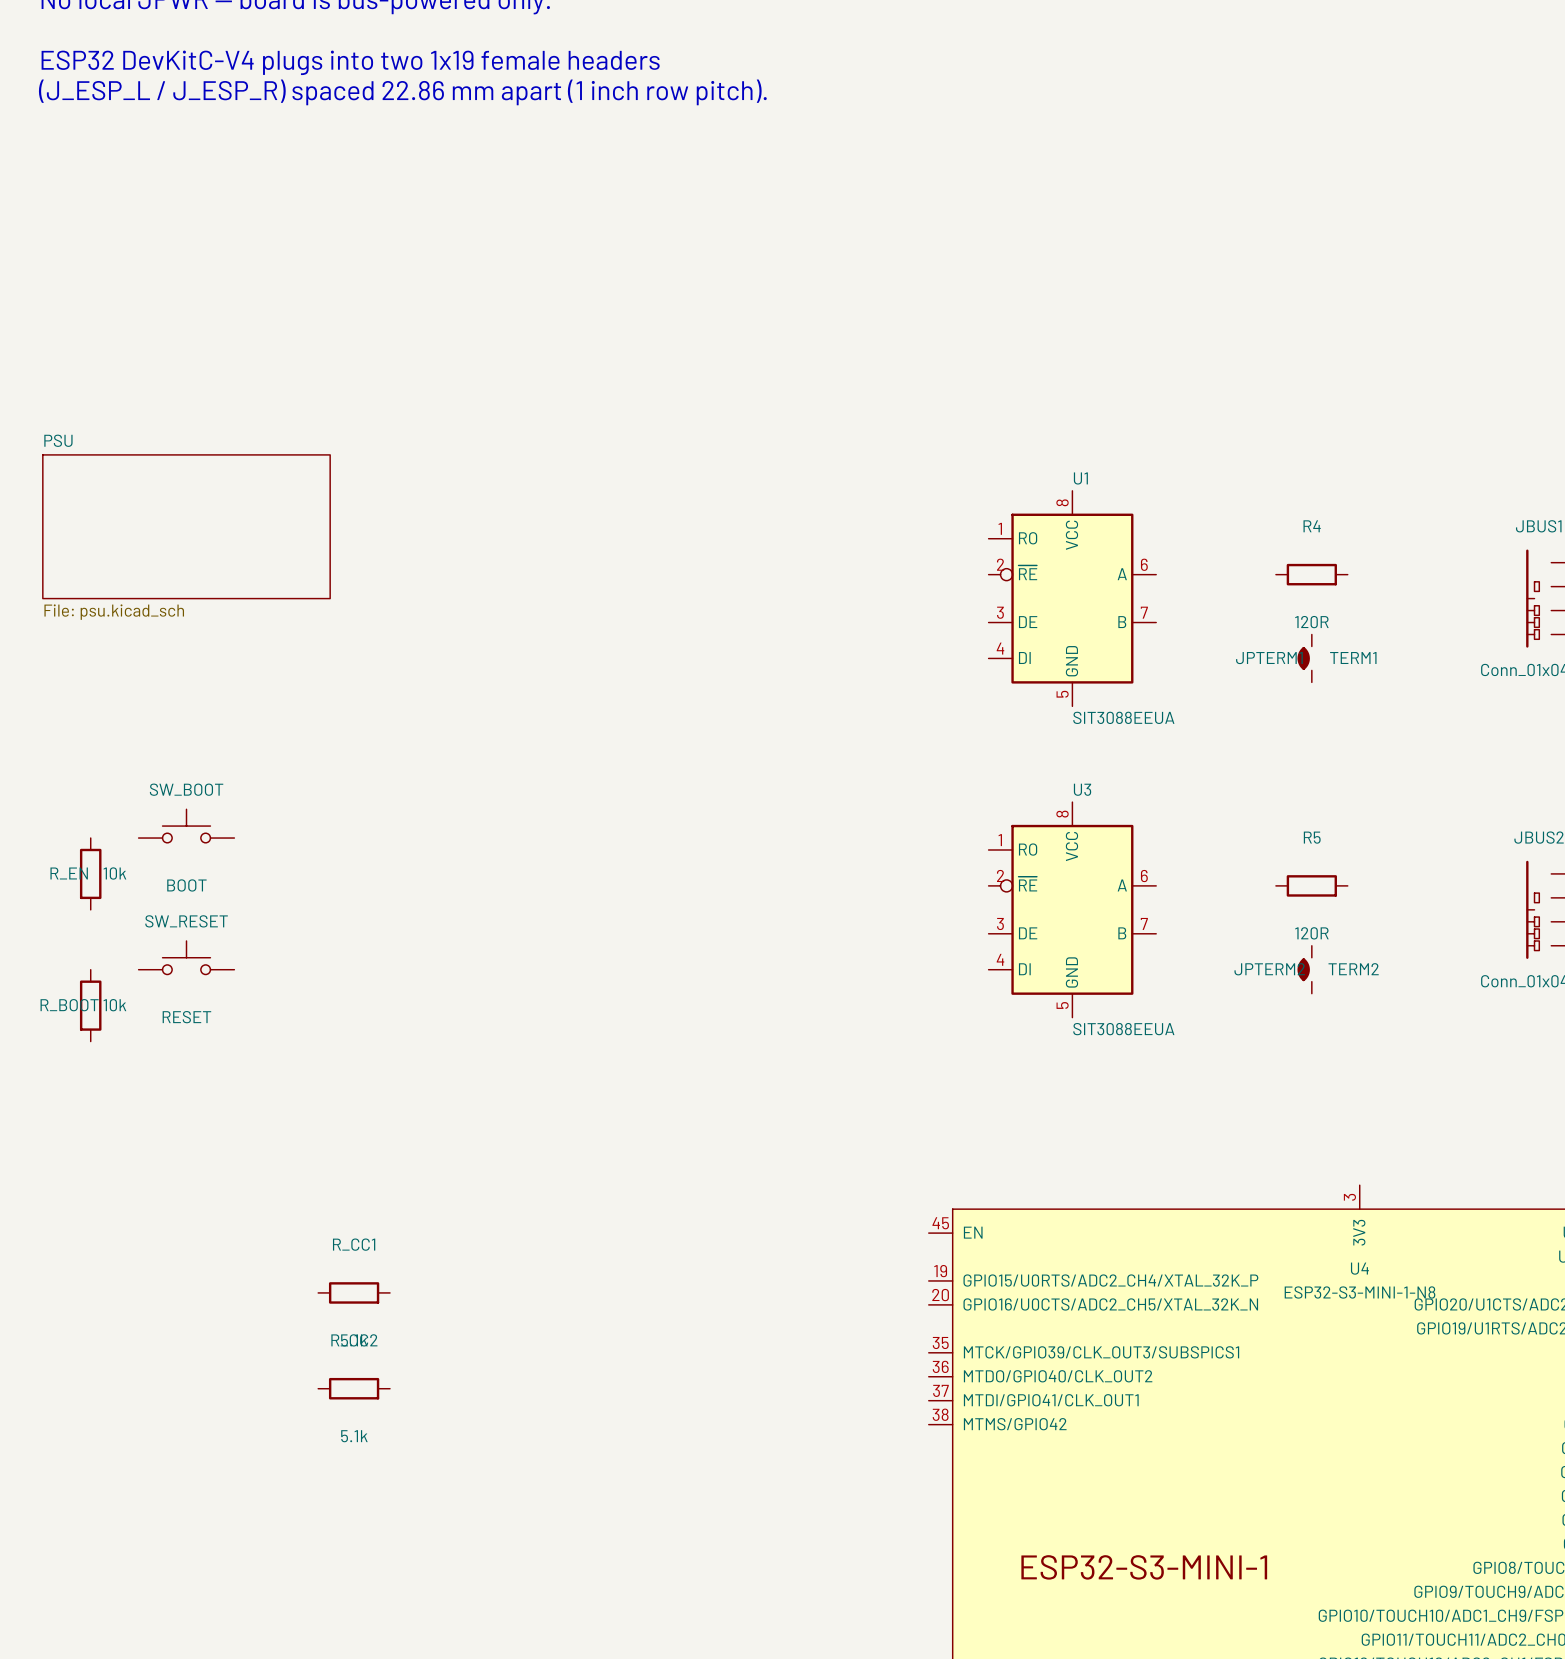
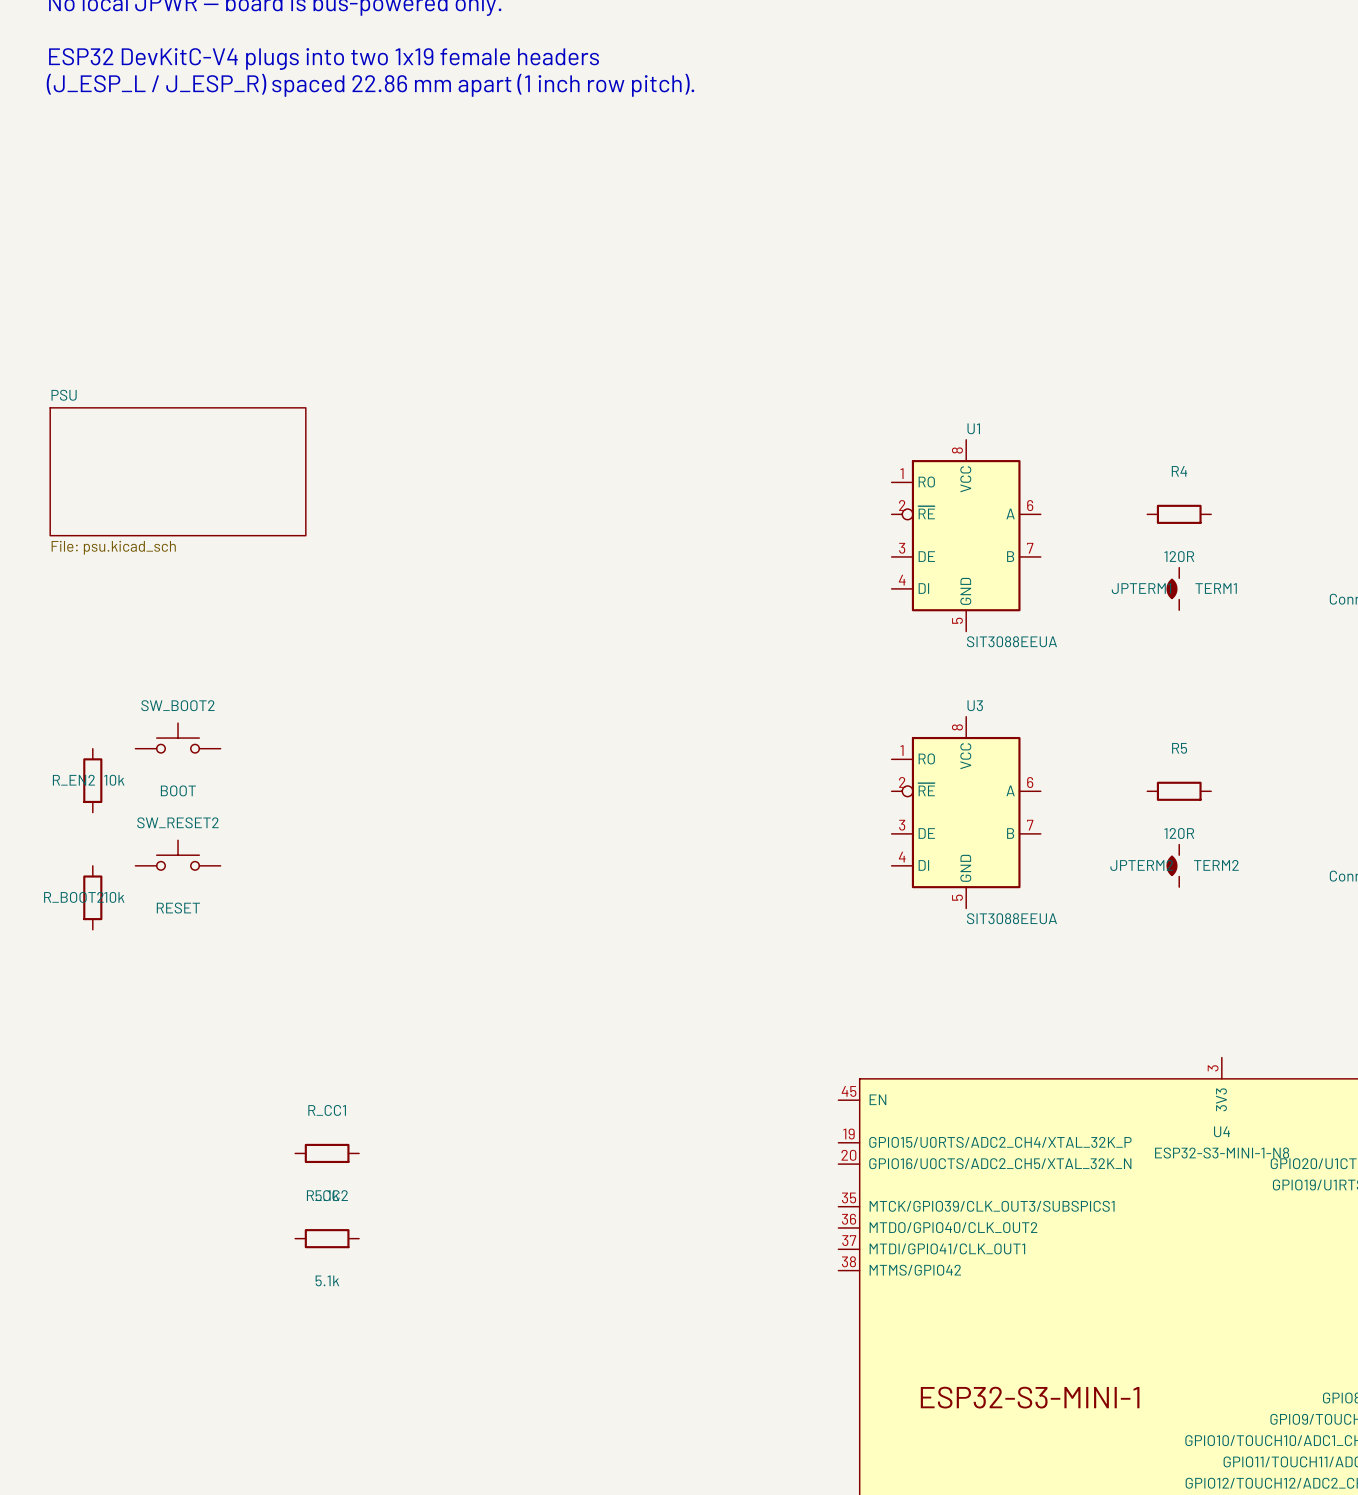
SW_BOOT name: SW_BOOT (186, 789) -> SW_BOOT2 (177, 705)
R_EN name: R_EN (69, 873) -> R_EN2 (73, 780)
SW_RESET name: SW_RESET (186, 921) -> SW_RESET2 (177, 822)
R_BOOT name: R_BOOT (69, 1005) -> R_BOOT2 (73, 897)

